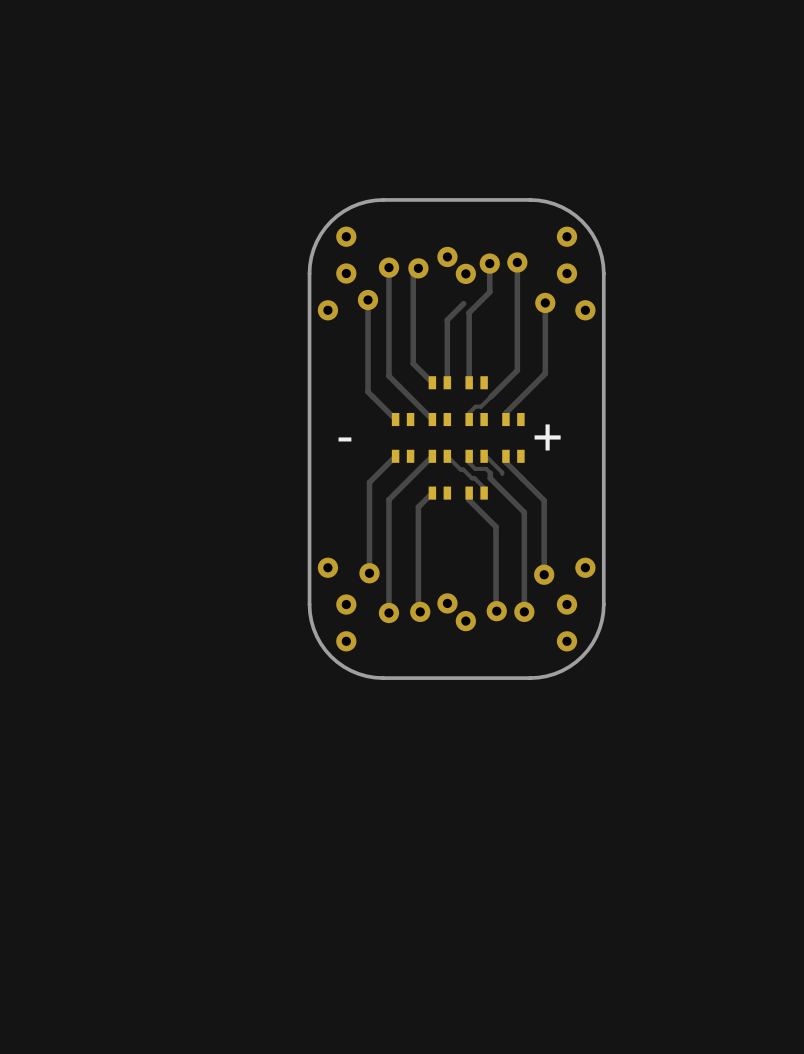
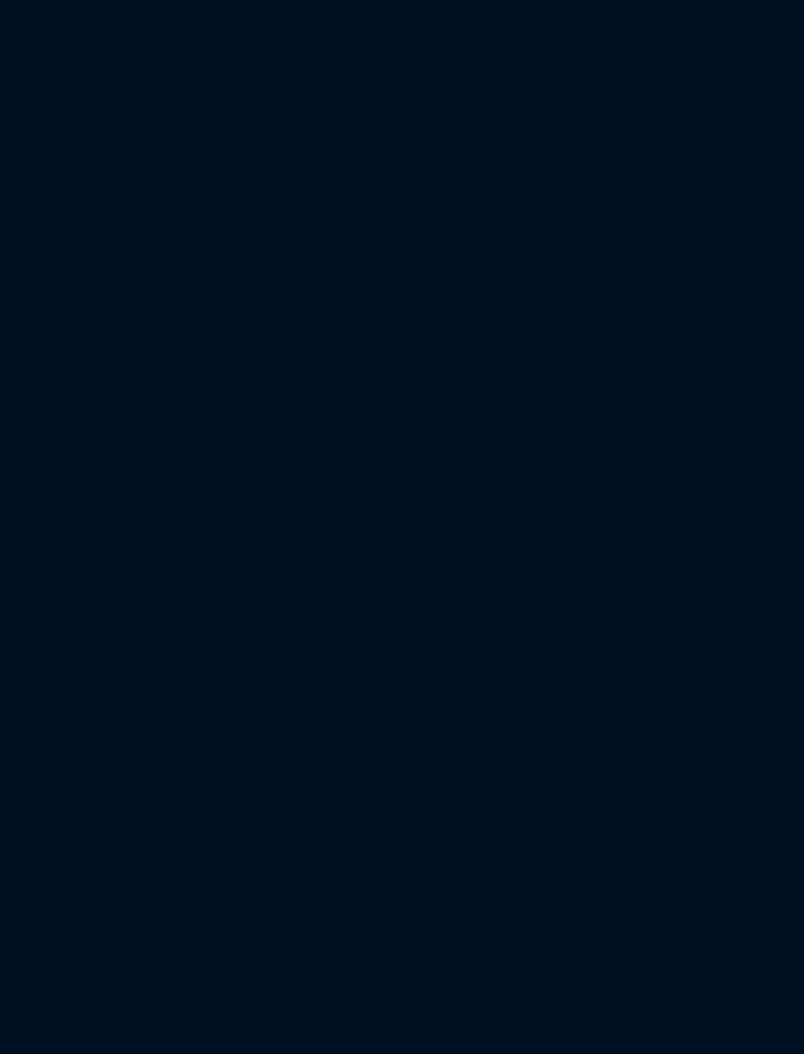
board edge: (383, 199) (530, 199) (546, 201) (562, 207) (582, 221) (592, 234) (599, 249) (603, 273) (603, 612) (599, 628) (587, 650) (569, 666) (554, 673) (530, 678) (383, 678) (366, 676) (351, 670) (337, 662) (325, 650) (313, 628) (309, 604) (310, 265) (316, 241) (331, 221) (351, 207) (366, 201) (383, 199) -> none
via: (346, 236) -> none
via: (567, 236) -> none
via: (447, 256) -> none
track: (517, 262) (517, 370) (481, 406) (475, 406) (469, 412) (469, 419) -> none
via: (517, 262) -> none
track: (489, 263) (489, 292) (469, 312) (469, 382) -> none
via: (489, 263) -> none
track: (388, 267) (388, 376) (432, 419) -> none
via: (388, 267) -> none
track: (418, 268) (413, 273) (413, 363) (432, 382) -> none
via: (418, 268) -> none
via: (346, 273) -> none
via: (465, 273) -> none
via: (567, 273) -> none
track: (368, 299) (368, 391) (395, 419) -> none
via: (368, 299) -> none
track: (545, 302) (545, 373) (505, 412) (505, 419) -> none
via: (545, 302) -> none
track: (463, 303) (447, 319) (447, 382) -> none
via: (327, 310) -> none
via: (585, 310) -> none
part: (439, 382) -> none
part: (476, 382) -> none
part: (403, 419) -> none
part: (439, 419) -> none
part: (476, 419) -> none
part: (513, 419) -> none
text: + (547, 437) -> none
text: - (344, 439) -> none
track: (395, 456) (369, 482) (369, 573) -> none
part: (403, 456) -> none
track: (432, 456) (388, 499) (388, 612) -> none
part: (439, 456) -> none
track: (447, 456) (460, 469) (474, 478) (484, 487) (484, 493) -> none
track: (469, 456) (469, 462) (475, 468) (486, 468) (490, 473) (490, 478) (524, 512) (524, 611) -> none
part: (476, 456) -> none
track: (484, 456) (502, 473) -> none
track: (505, 456) (505, 462) (544, 500) (544, 574) -> none
part: (513, 456) -> none
track: (432, 493) (418, 507) (418, 610) (420, 611) -> none
part: (439, 493) -> none
track: (469, 493) (469, 500) (496, 526) (496, 611) -> none
part: (476, 493) -> none
via: (327, 567) -> none
via: (585, 567) -> none
via: (369, 573) -> none
via: (544, 574) -> none
via: (447, 603) -> none
via: (346, 604) -> none
via: (567, 604) -> none
via: (420, 611) -> none
via: (496, 611) -> none
via: (524, 611) -> none
via: (388, 612) -> none
via: (465, 621) -> none
via: (346, 641) -> none
via: (567, 641) -> none

